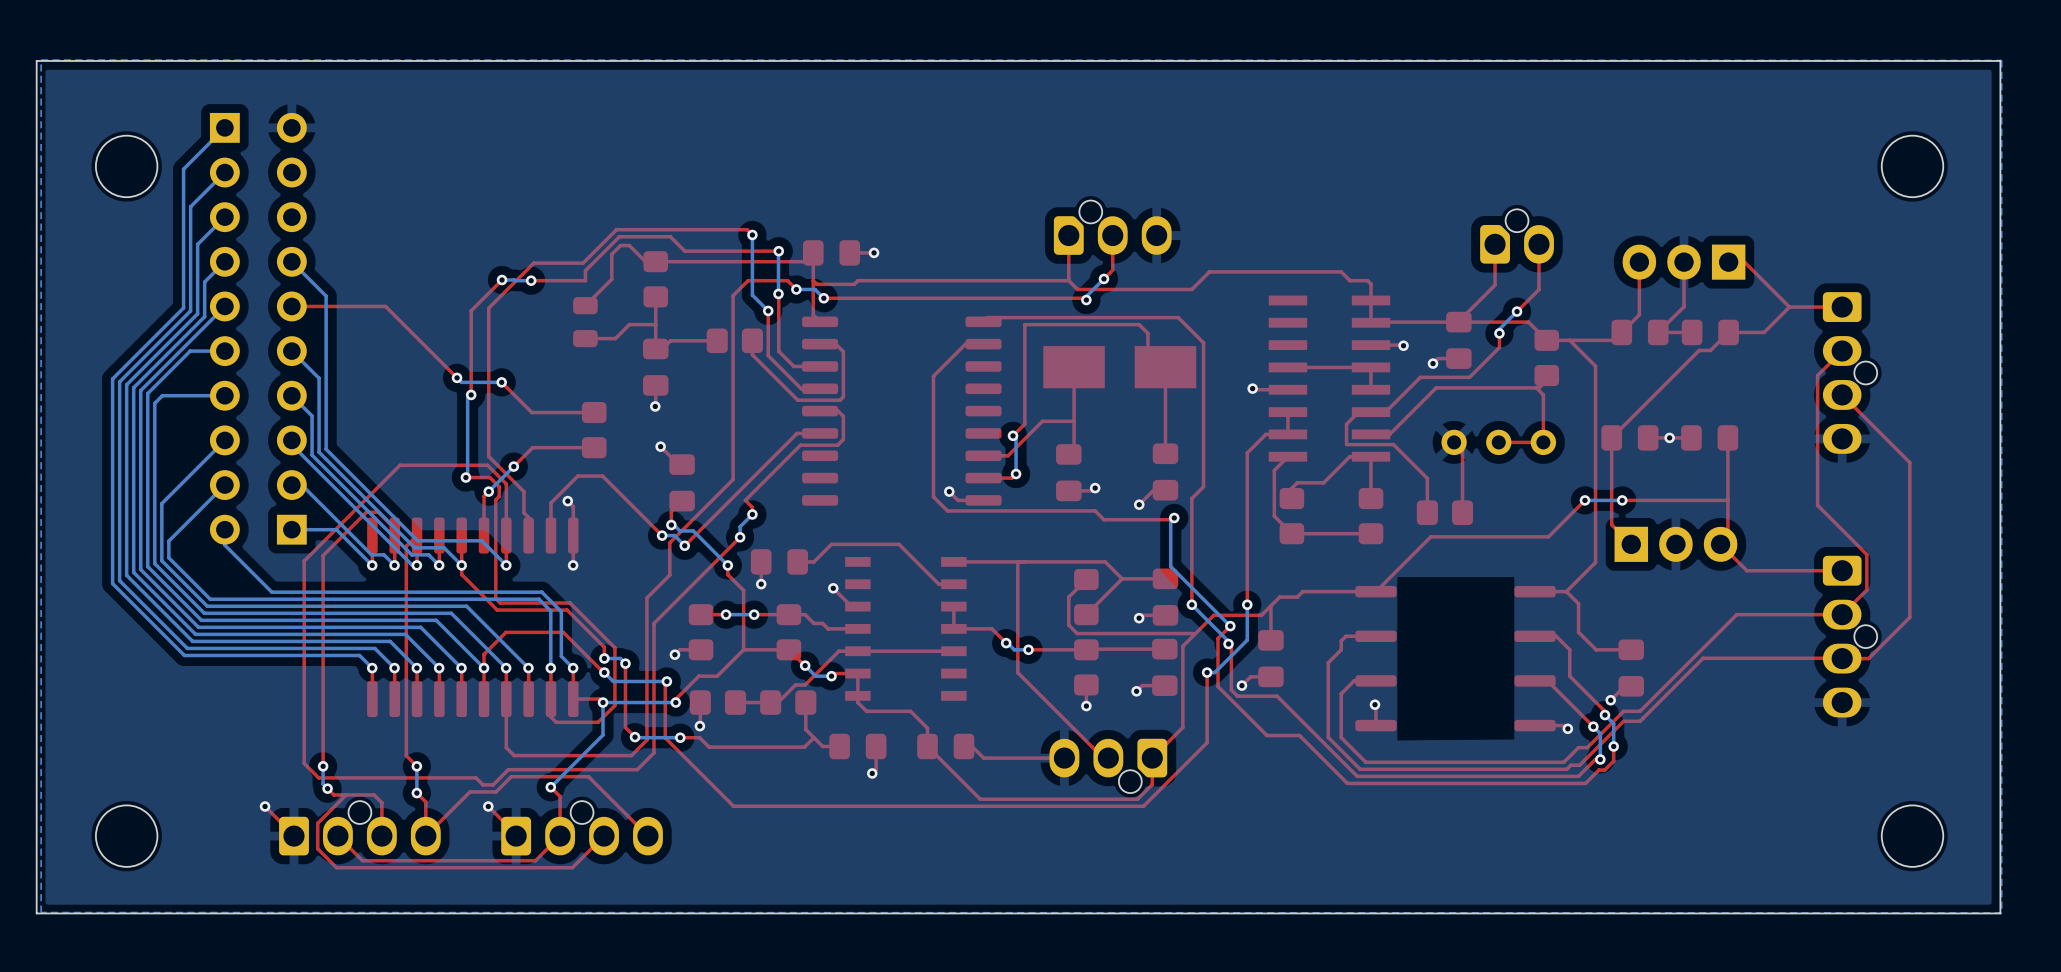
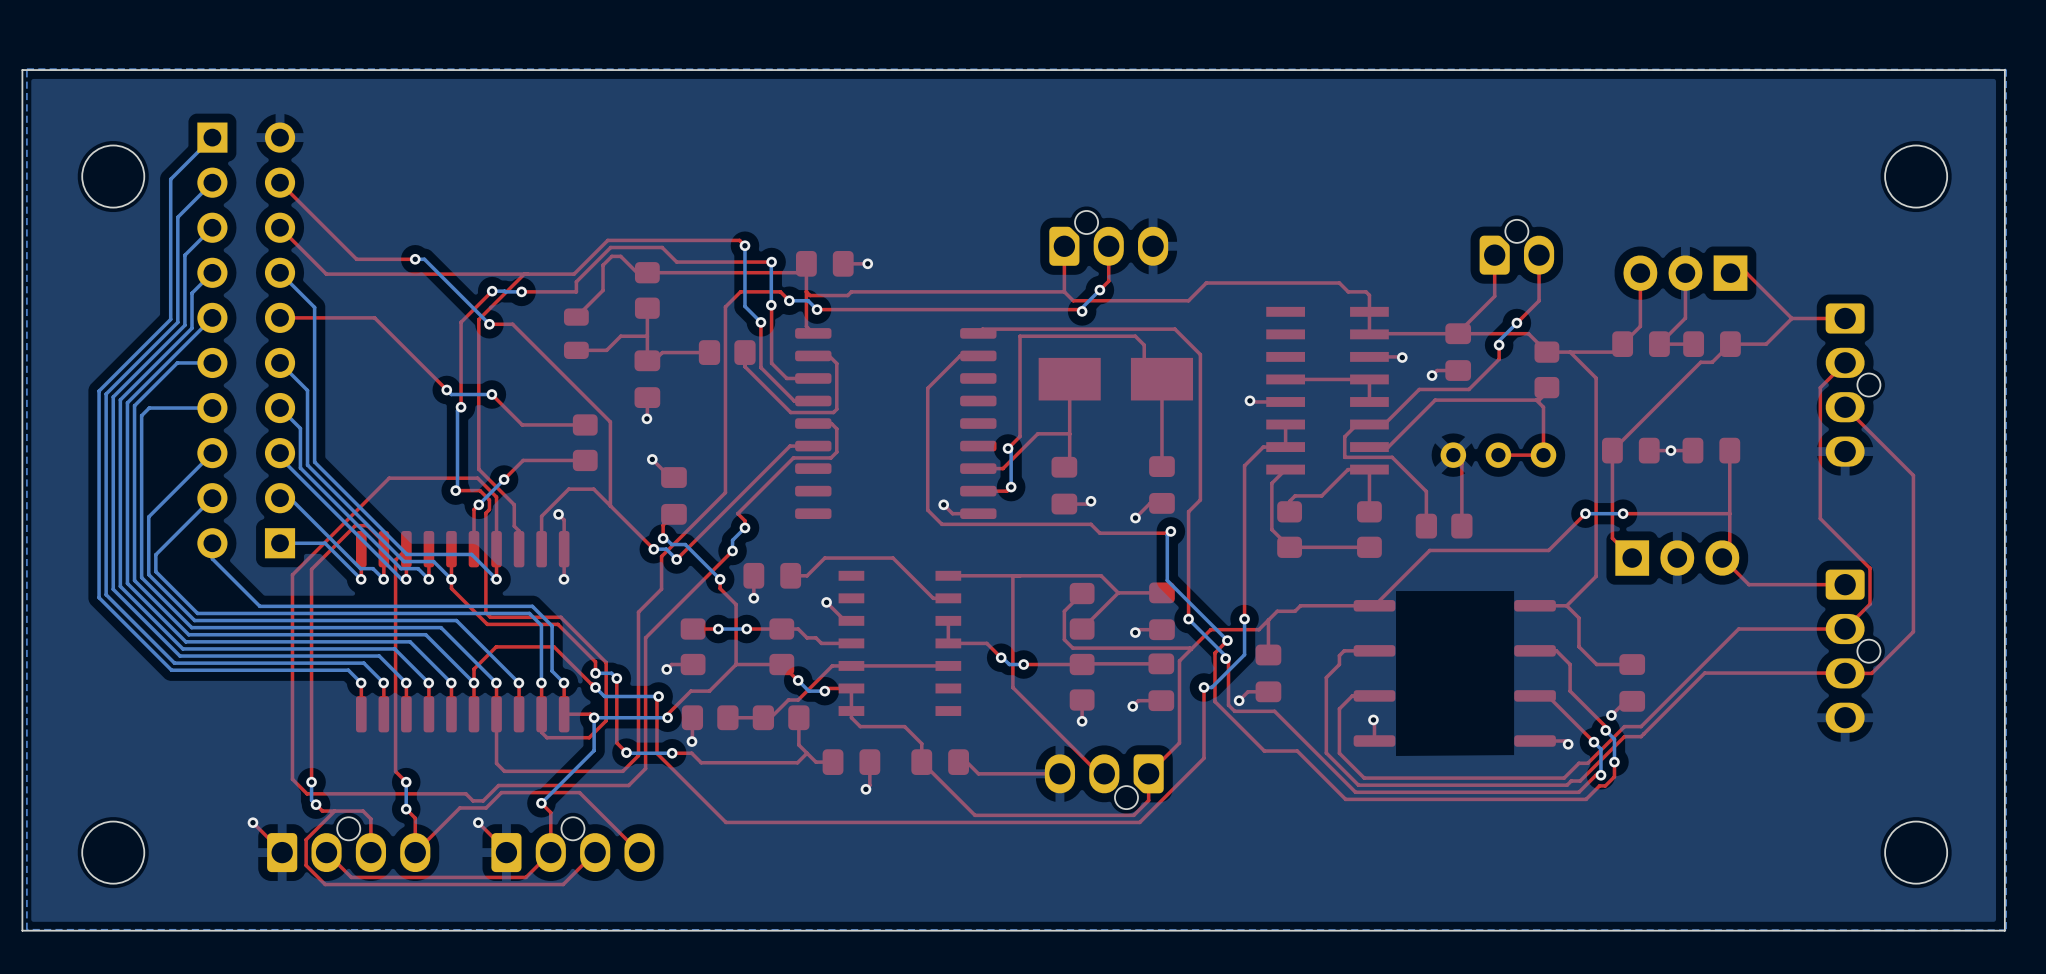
top track: none -> (280, 182) (356, 259) (415, 259)
top track: none -> (280, 227) (326, 274) (524, 274)
bottom track: none -> (415, 259) (424, 259) (489, 324)
via: none -> (415, 259)
top track: none -> (489, 324) (512, 324) (610, 421) (610, 505)
via: none -> (489, 324)

